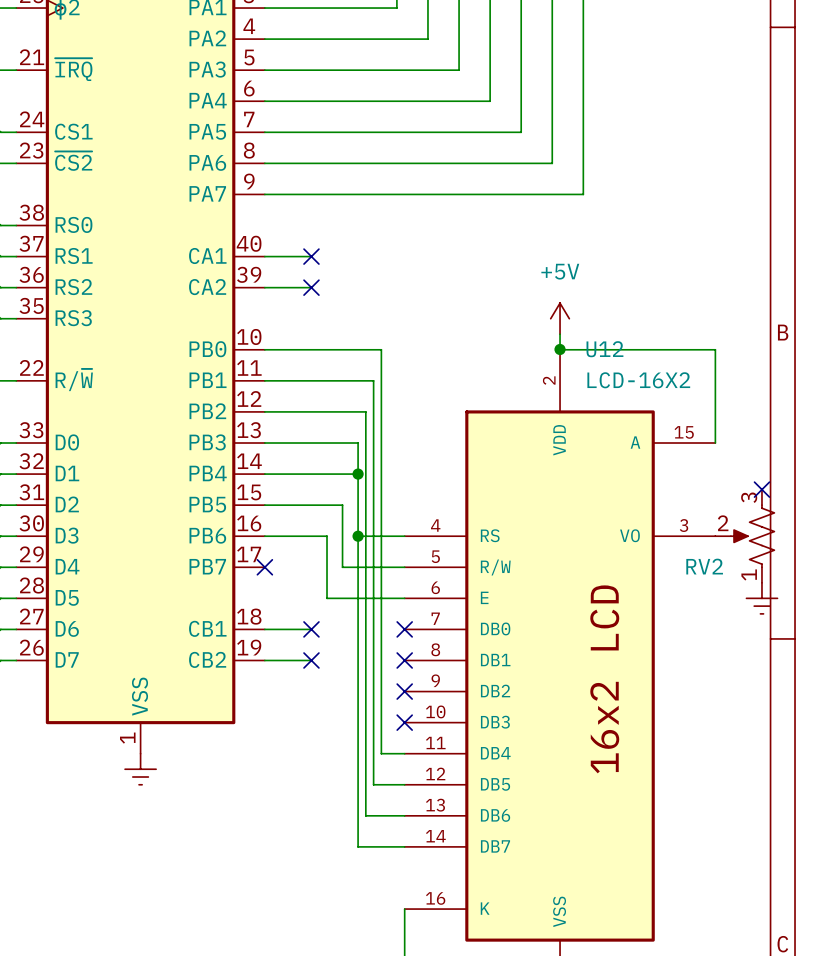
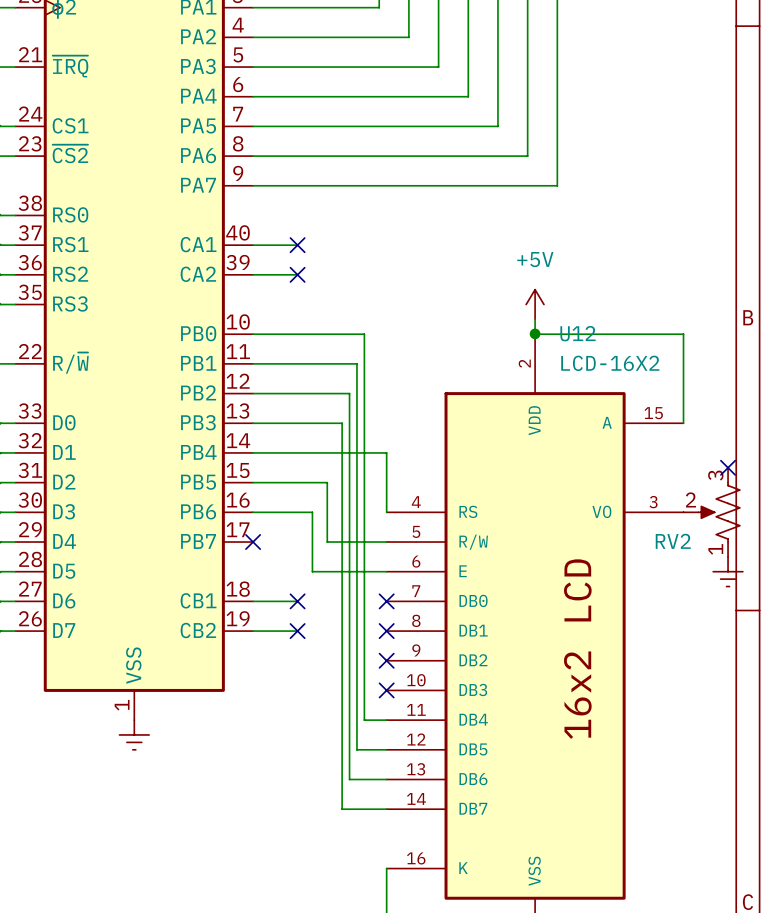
junction: (358, 474) -> none
wire: (358, 536) (404, 536) -> (342, 452) (386, 452) (386, 512)
junction: (358, 536) -> none

